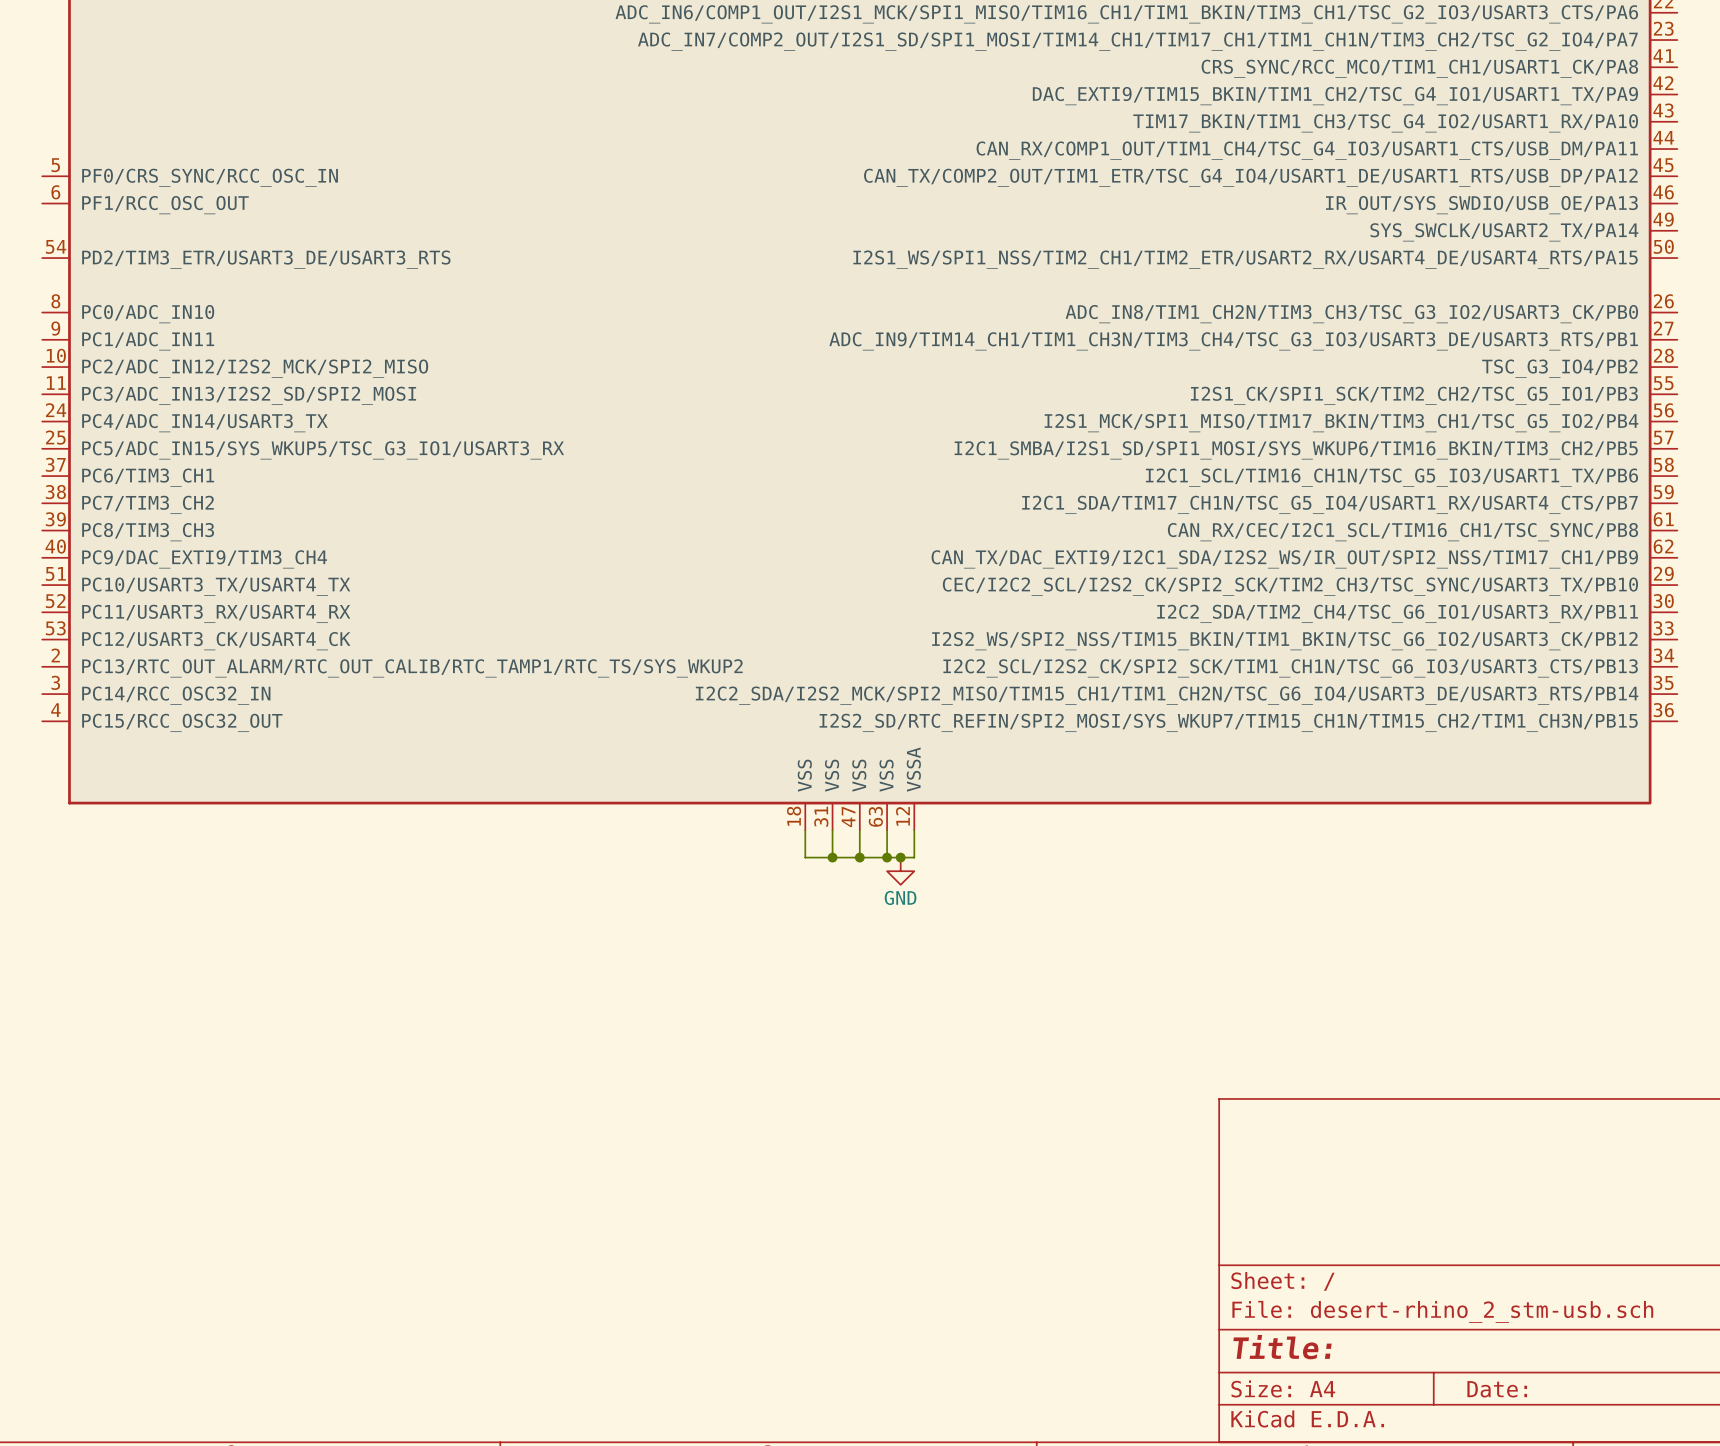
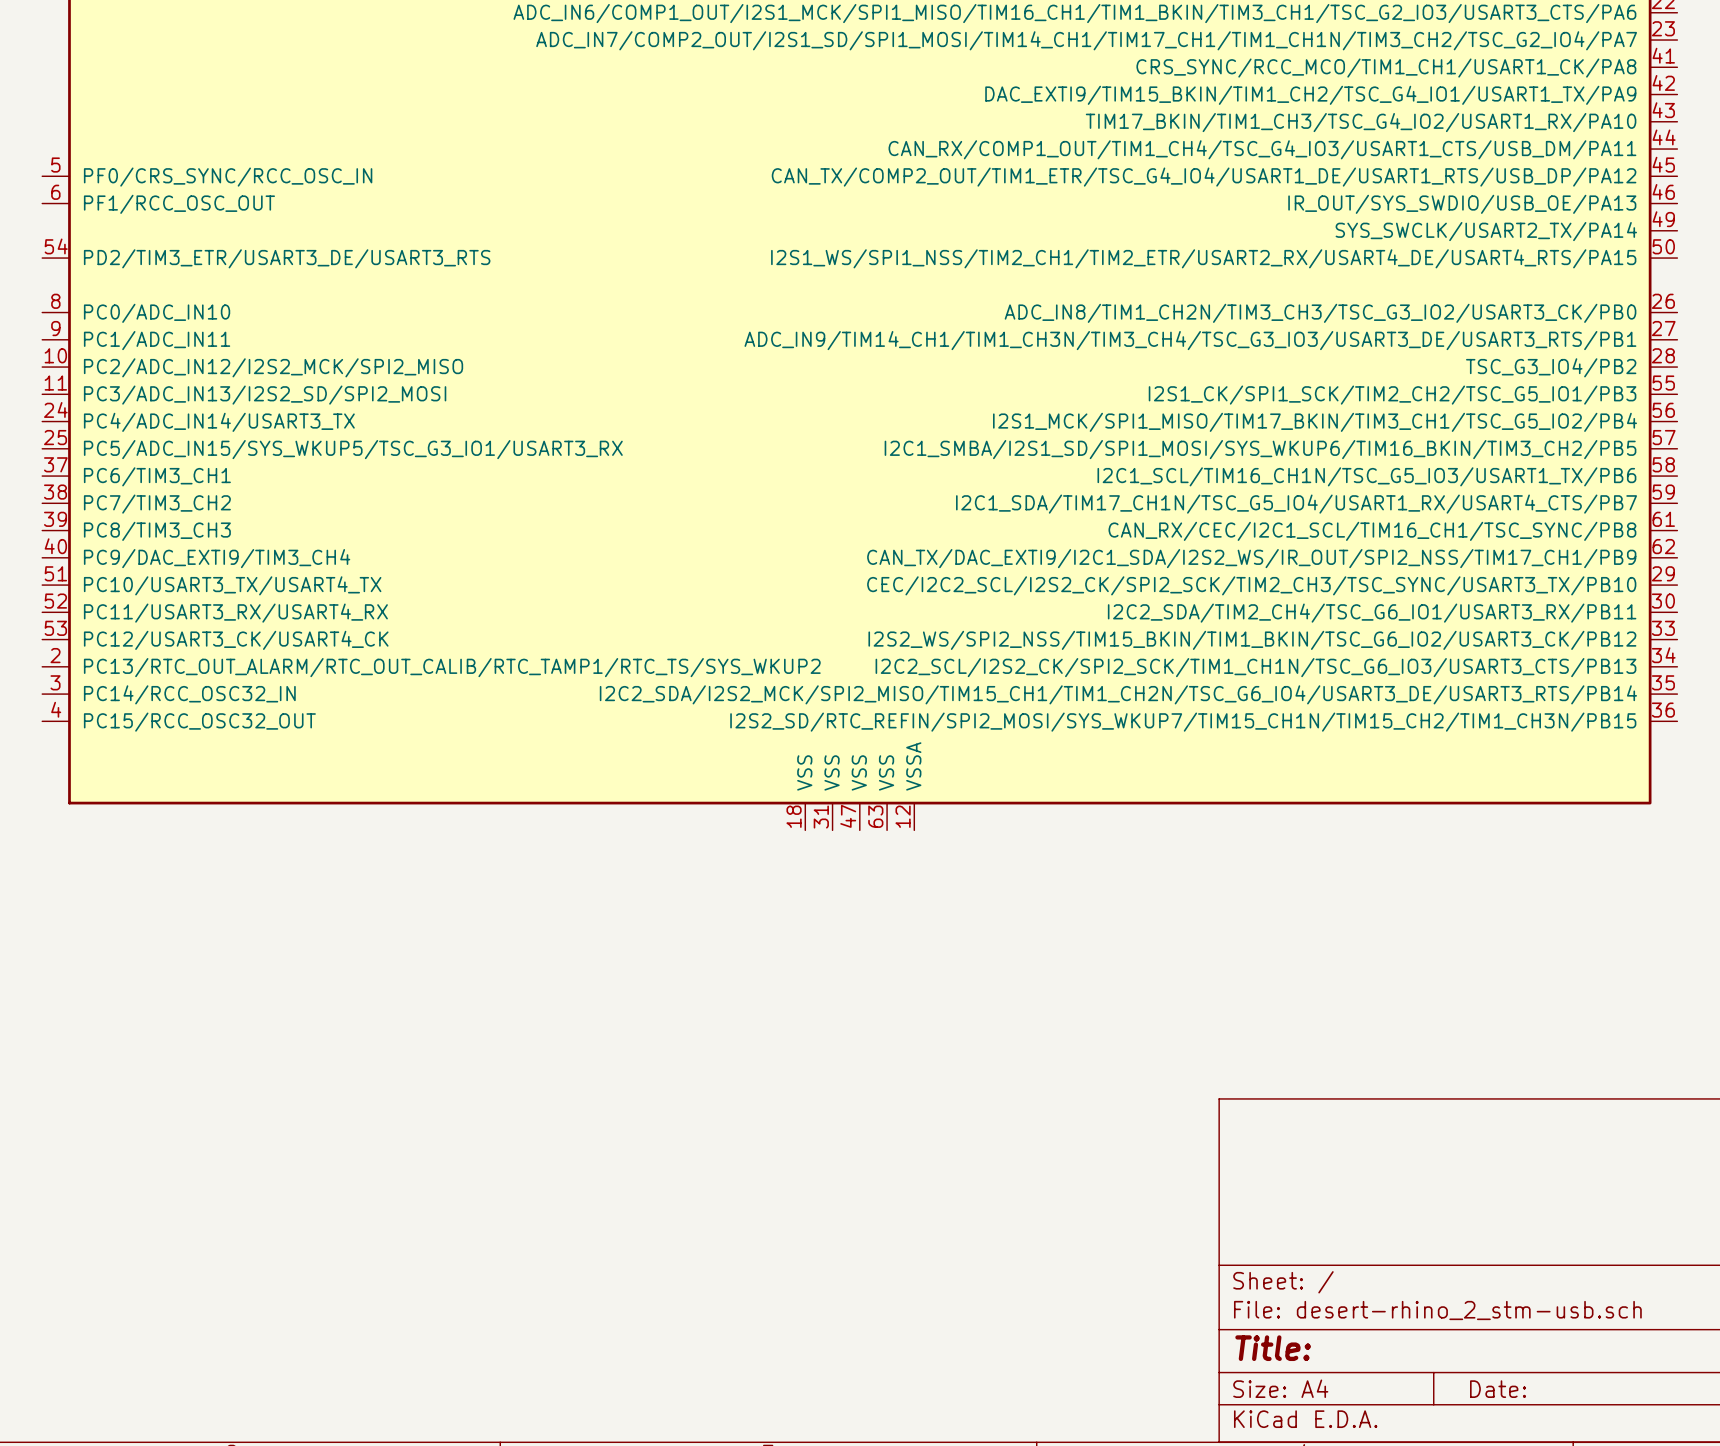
wire: (805, 830) (805, 857) (914, 857) (914, 830) -> none
wire: (832, 830) (832, 857) -> none
wire: (859, 830) (859, 857) -> none
wire: (887, 830) (887, 857) -> none
junction: (832, 857) -> none
junction: (859, 857) -> none
junction: (887, 857) -> none
junction: (900, 857) -> none
power symbol: GND (900, 871) -> none

